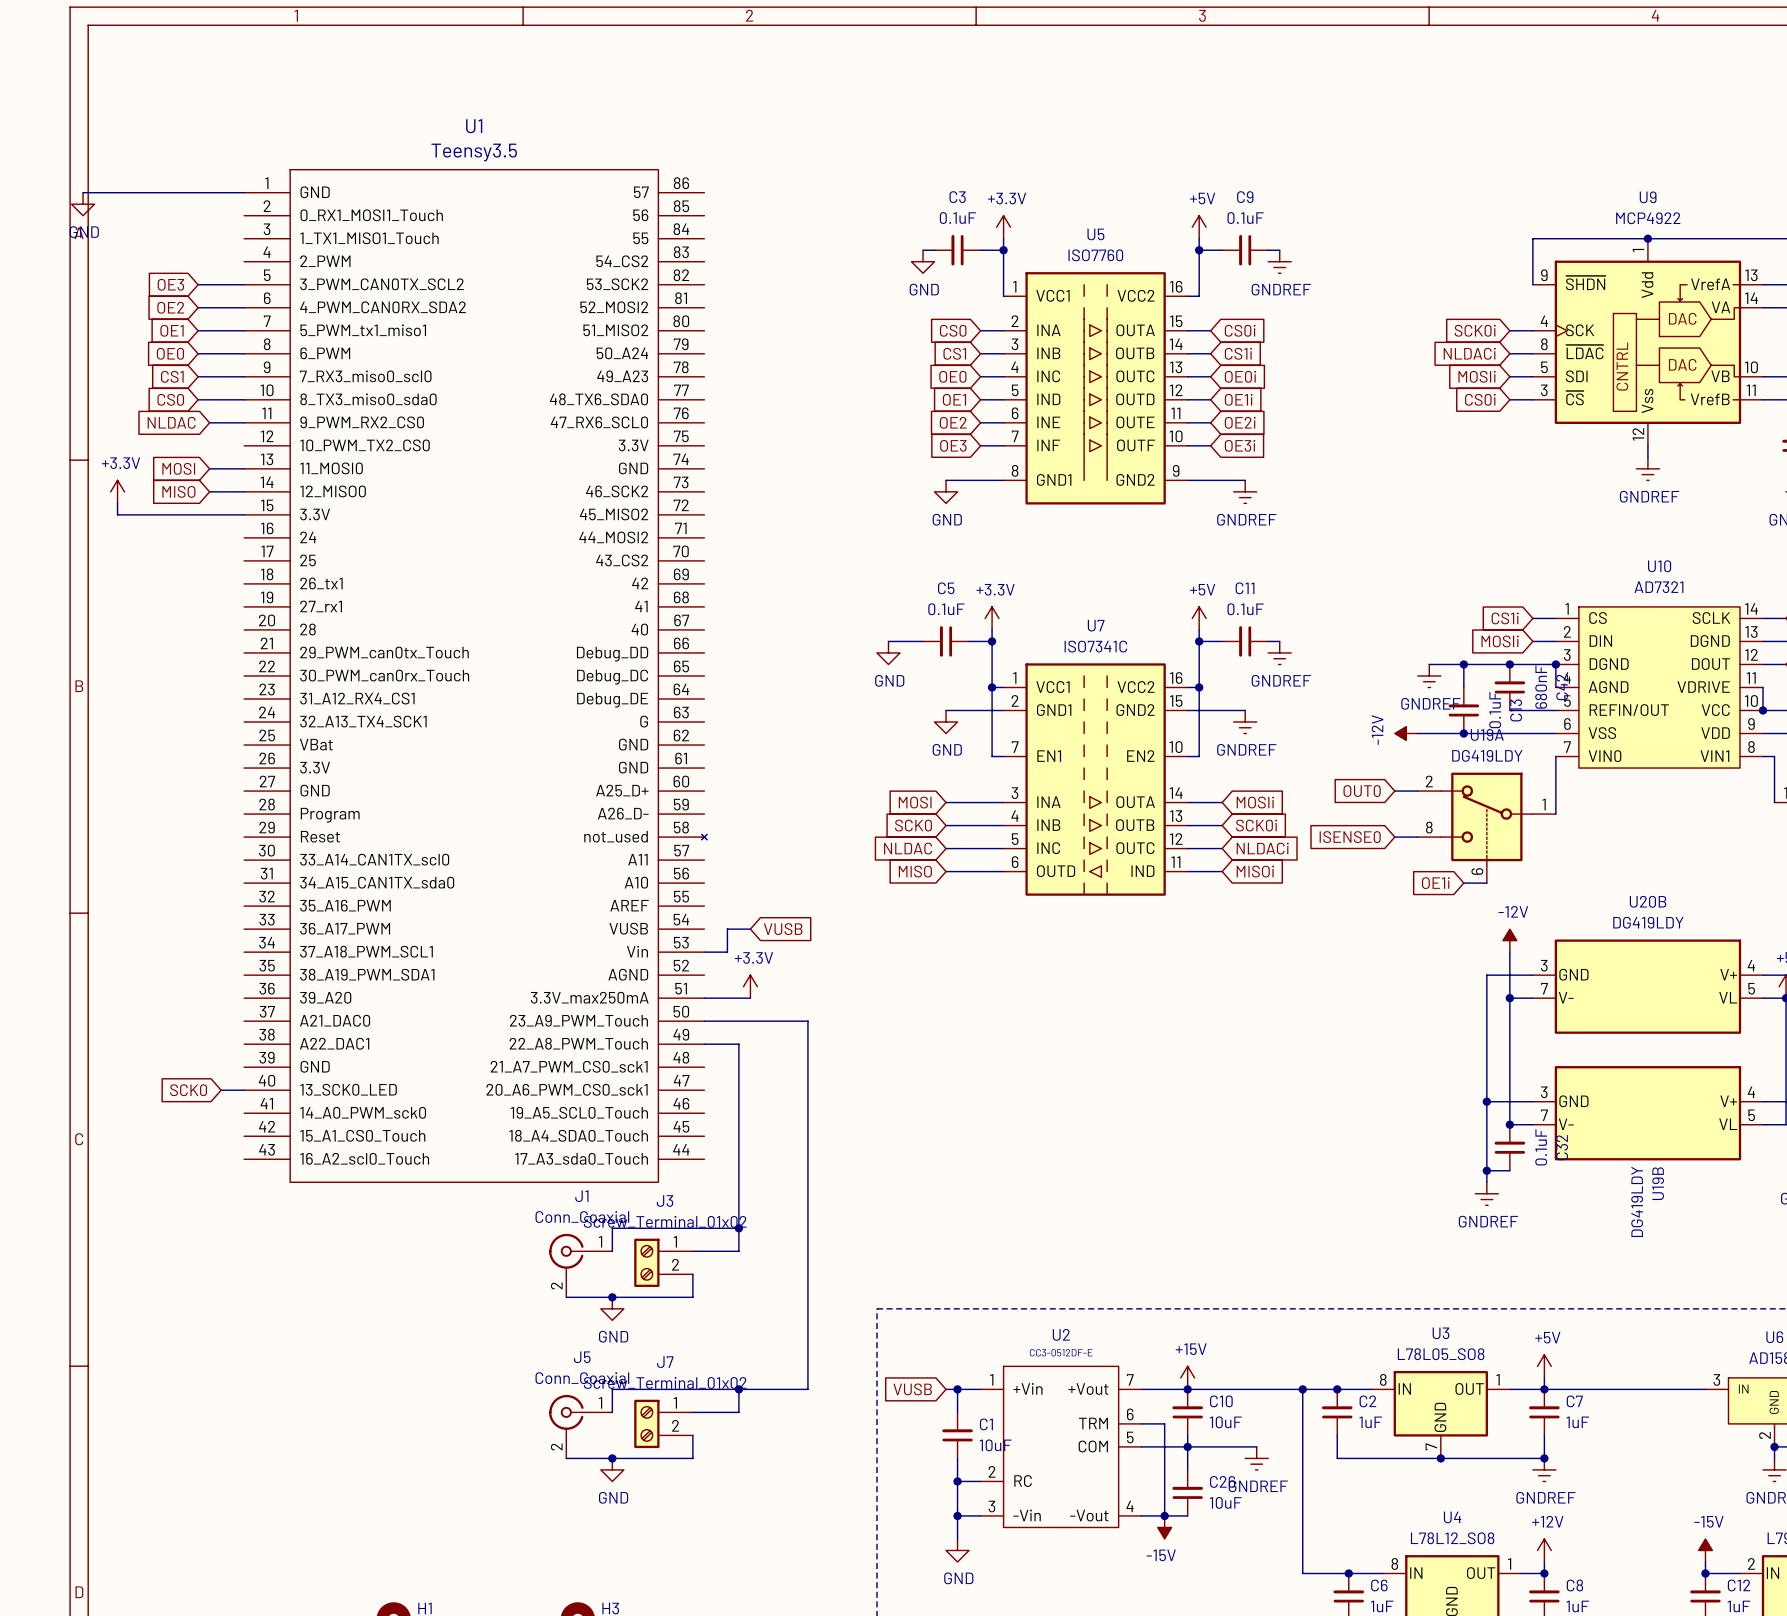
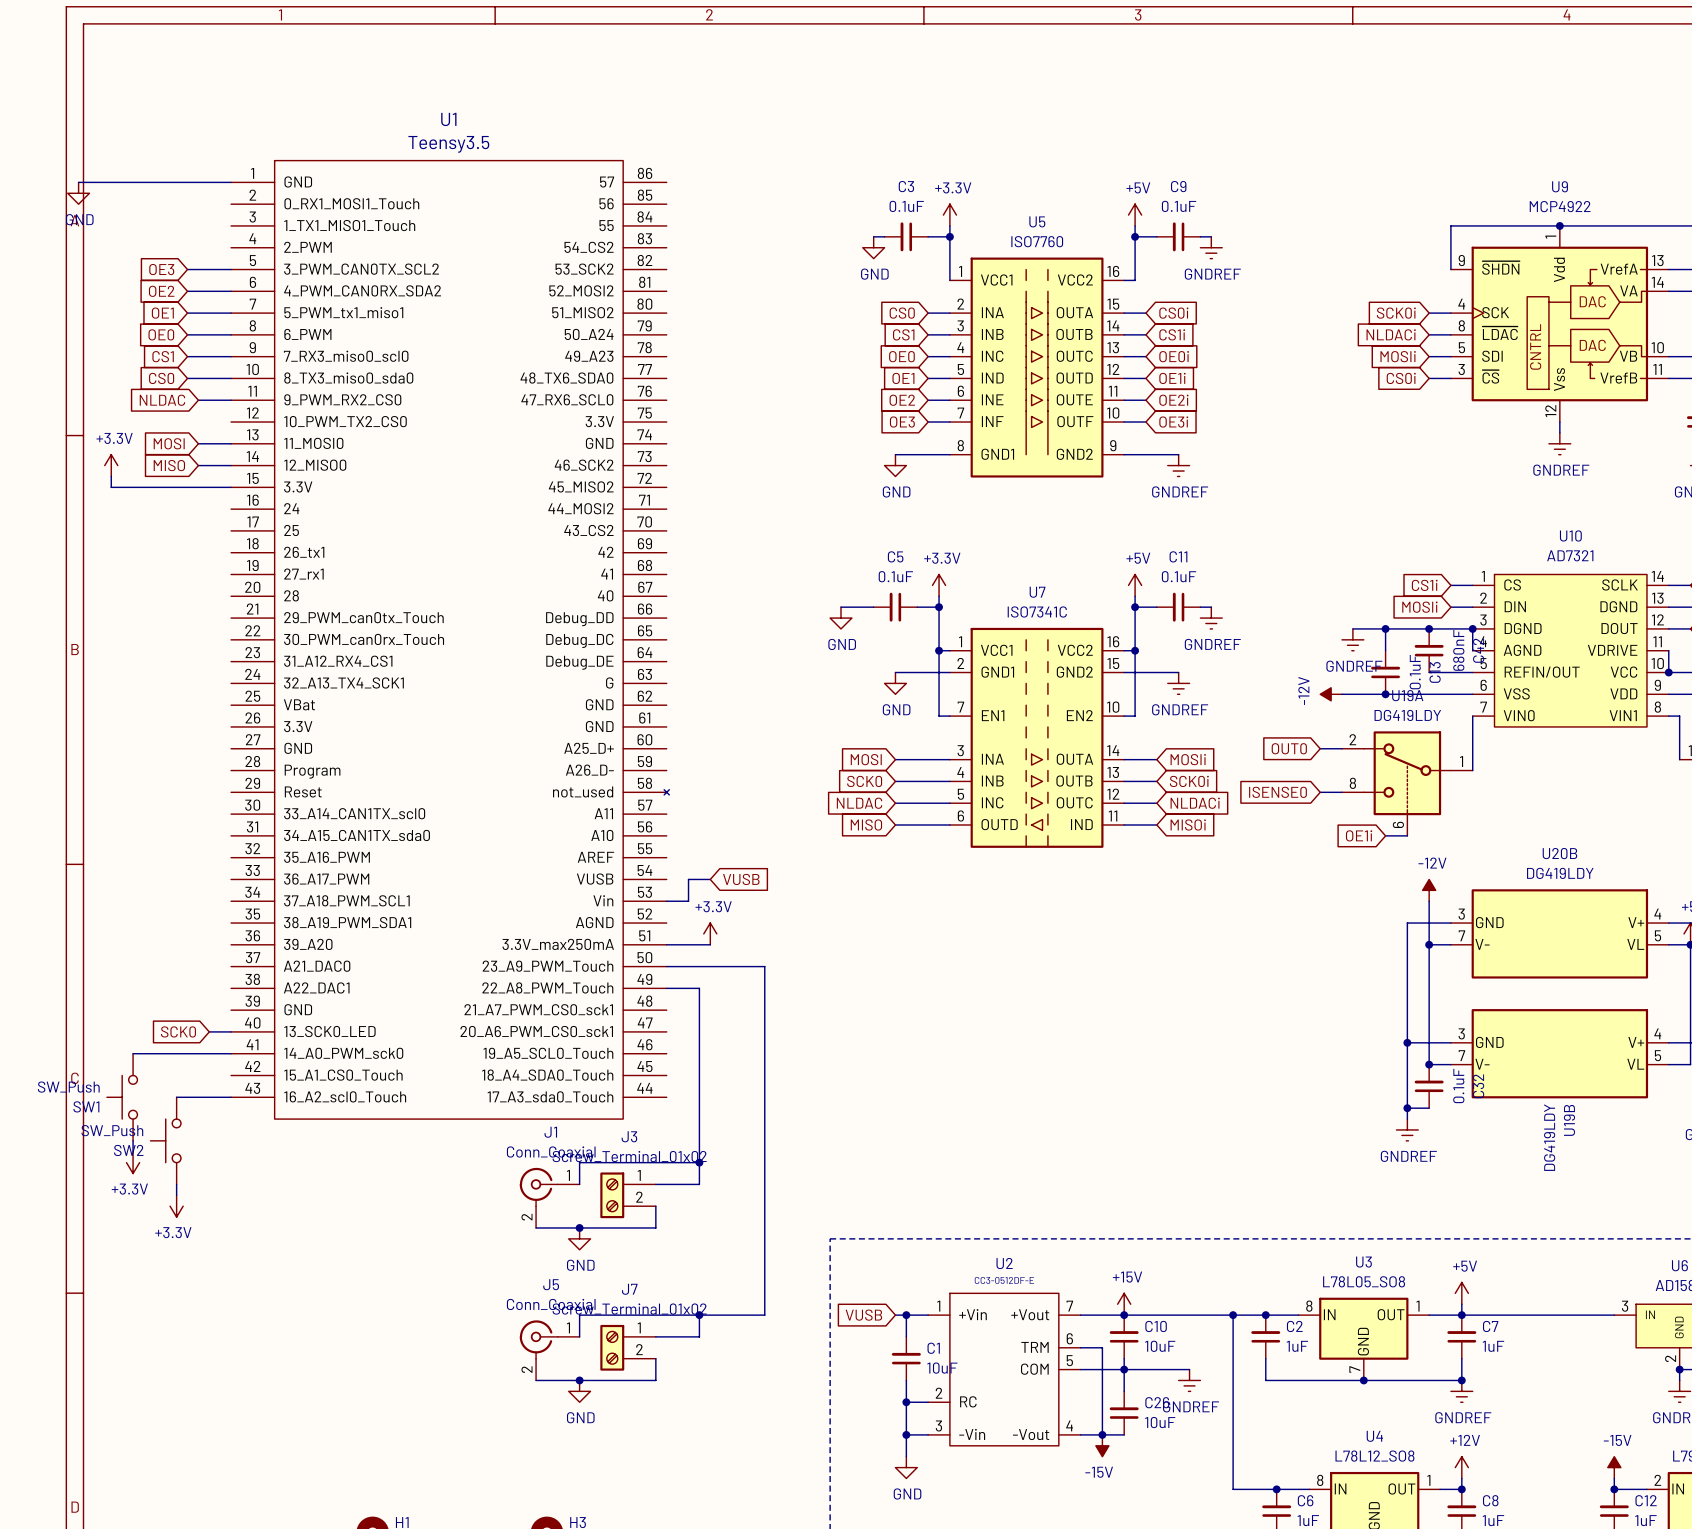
wire: none -> (133, 1053) (231, 1053)
SW1: none -> SW_Push (122, 1097)
wire: none -> (176, 1097) (231, 1097)
wire: none -> (133, 1140) (133, 1151)
SW2: none -> SW_Push (165, 1140)
power symbol: none -> +3.3V (133, 1162)
wire: none -> (176, 1184) (176, 1195)
power symbol: none -> +3.3V (176, 1206)

